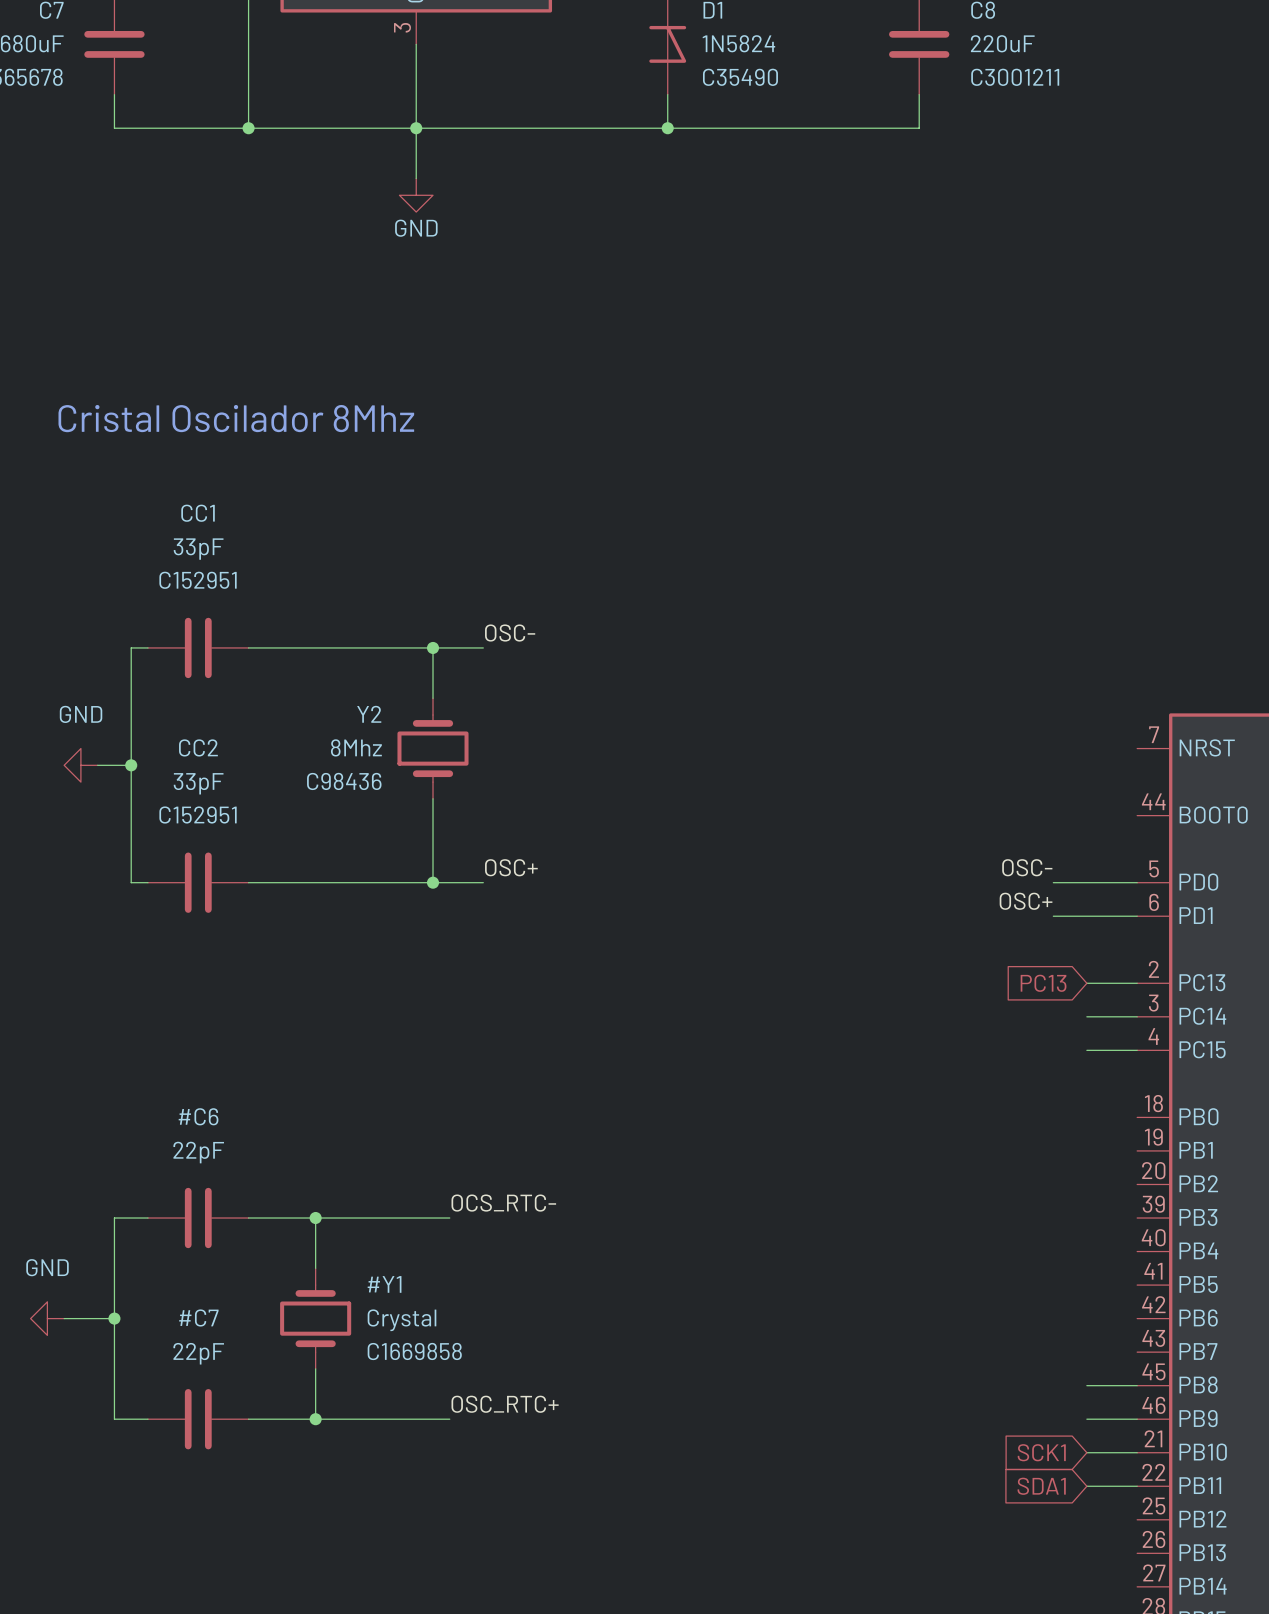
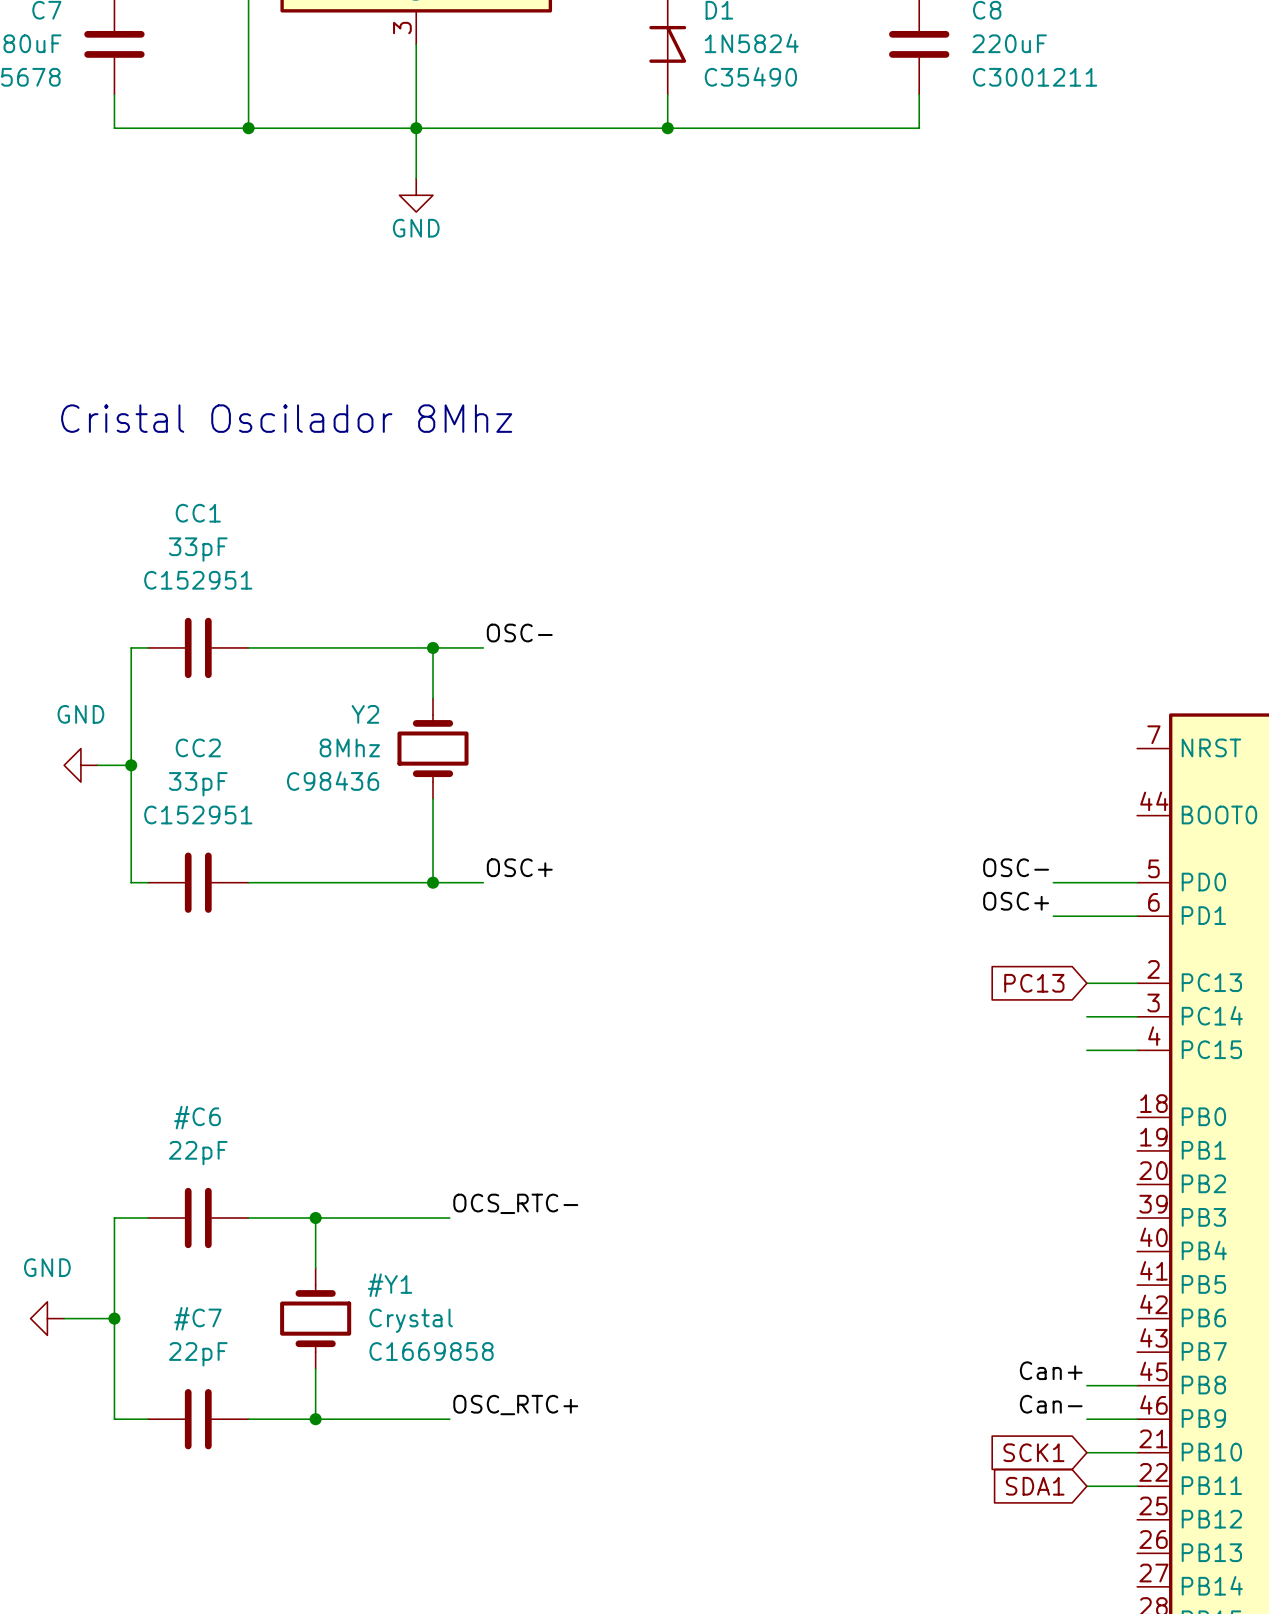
label: none -> Can+ (1051, 1370)
label: none -> Can- (1051, 1404)

